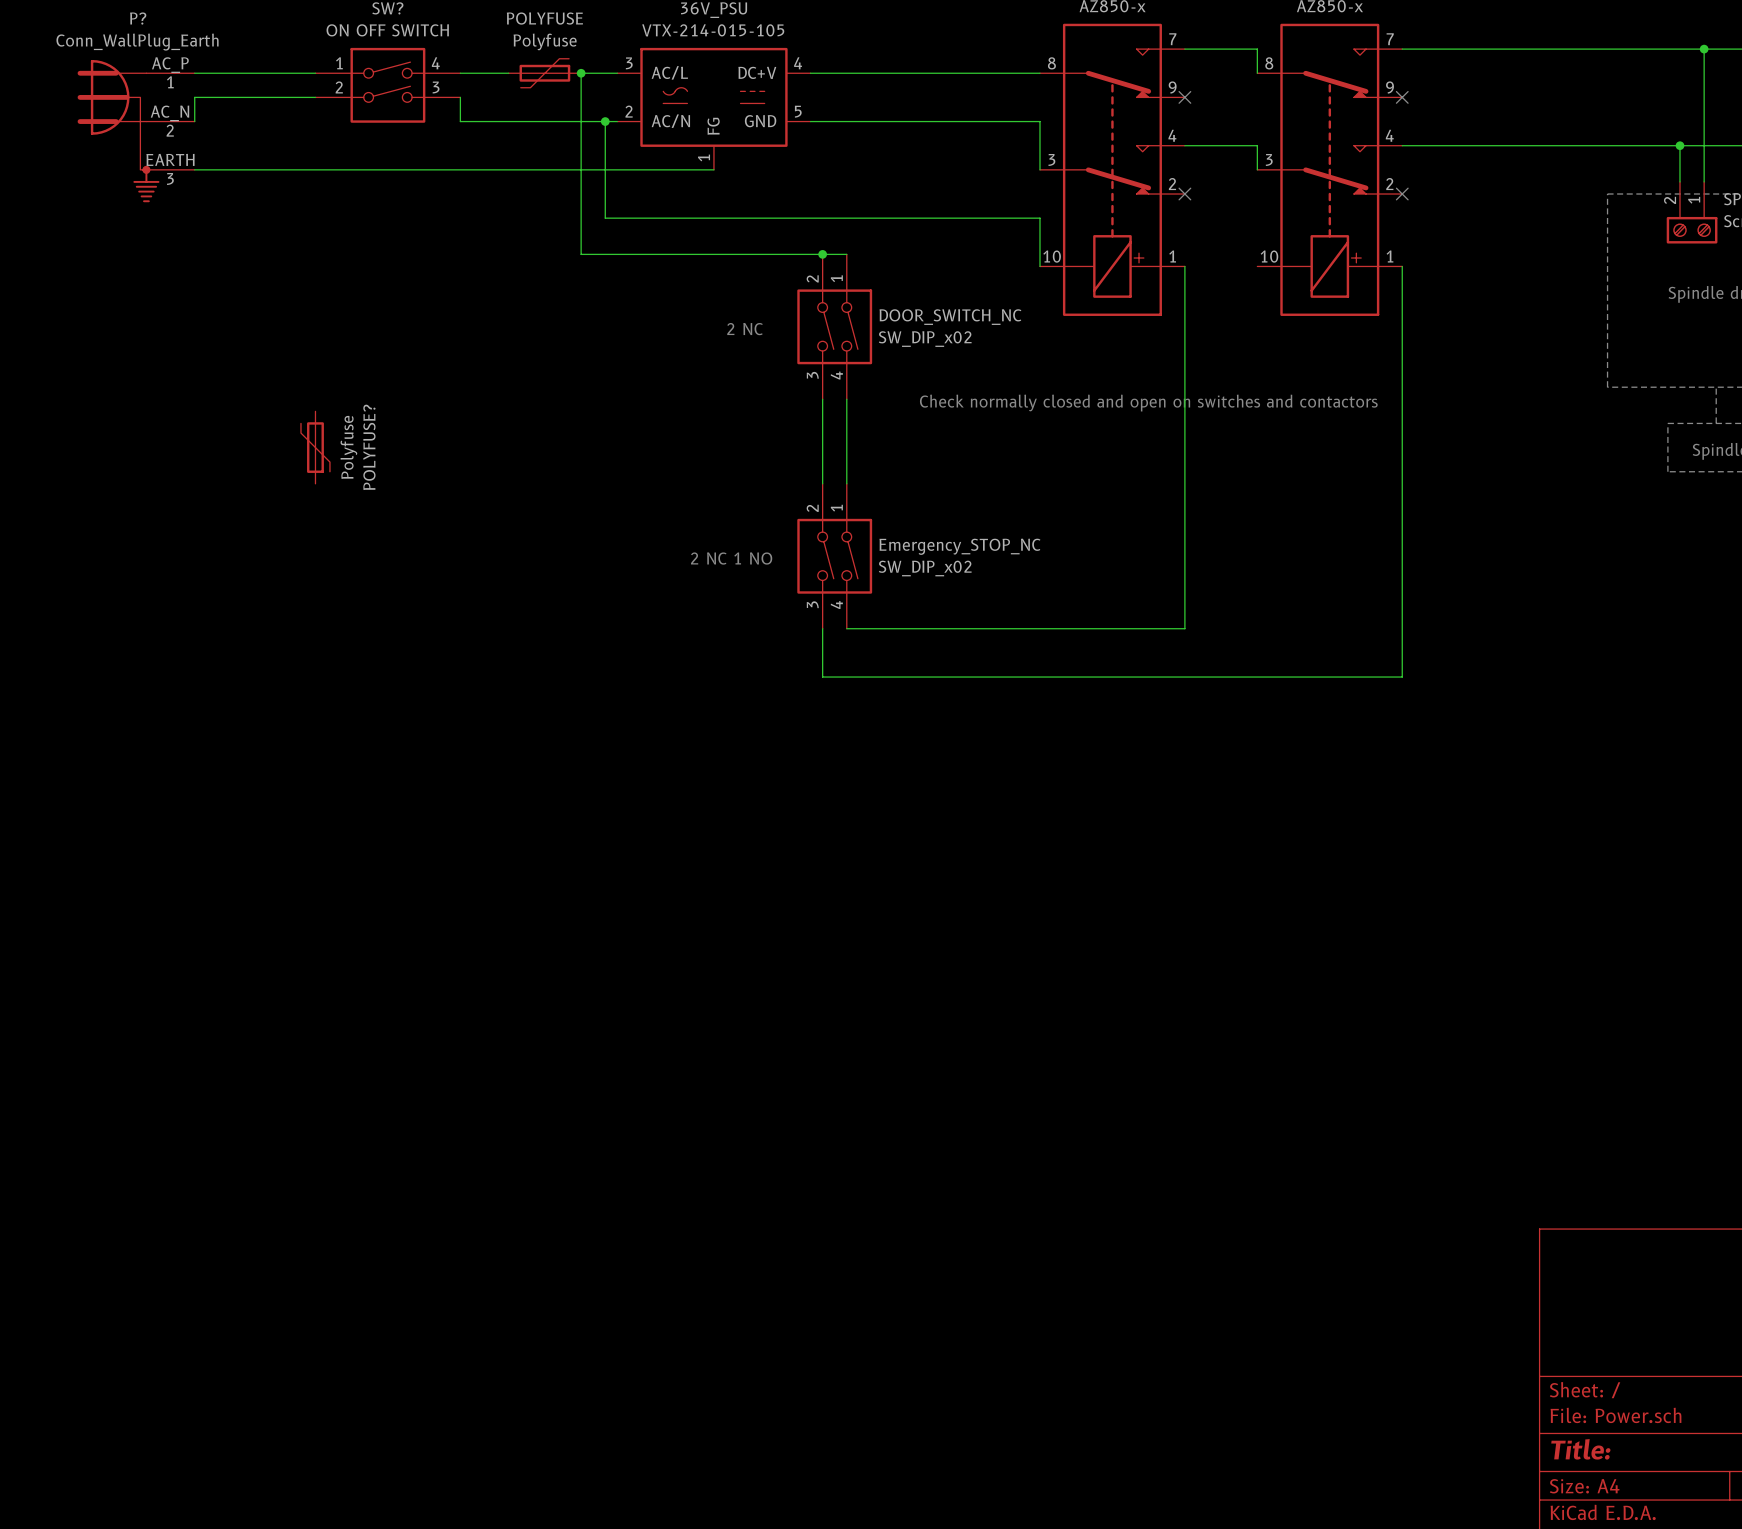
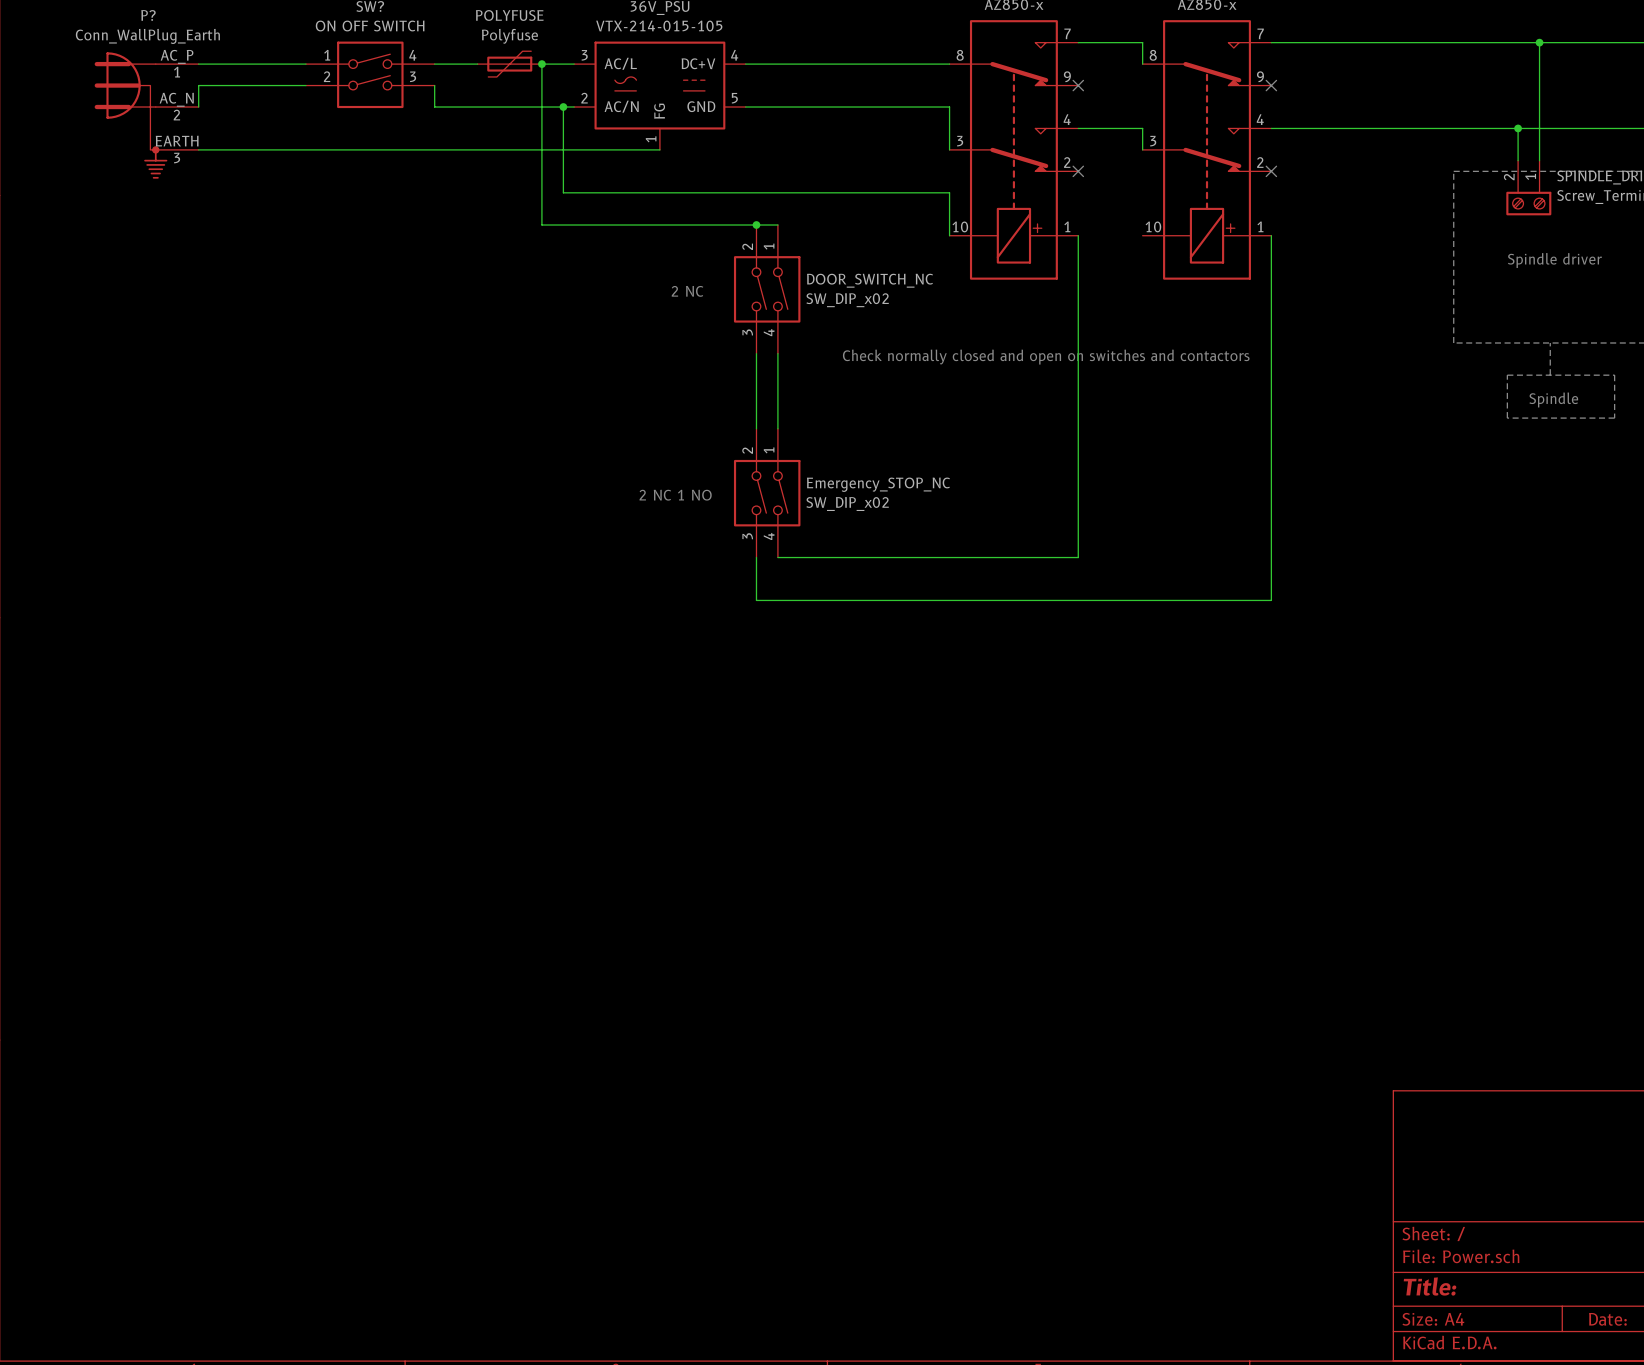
POLYFUSE?: Polyfuse (315, 447) -> none

